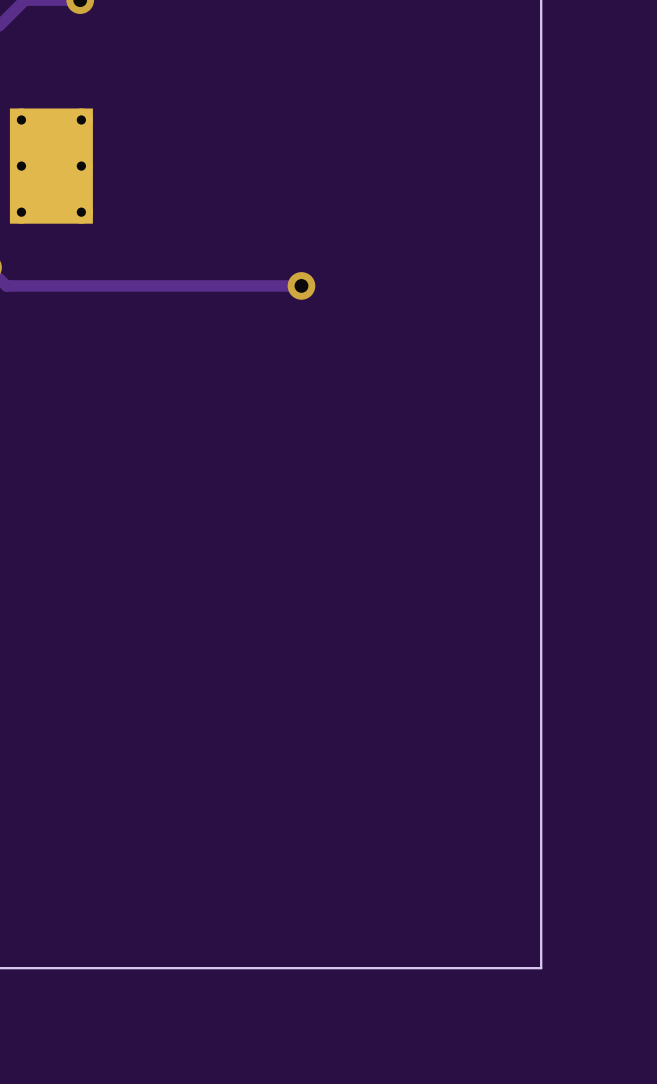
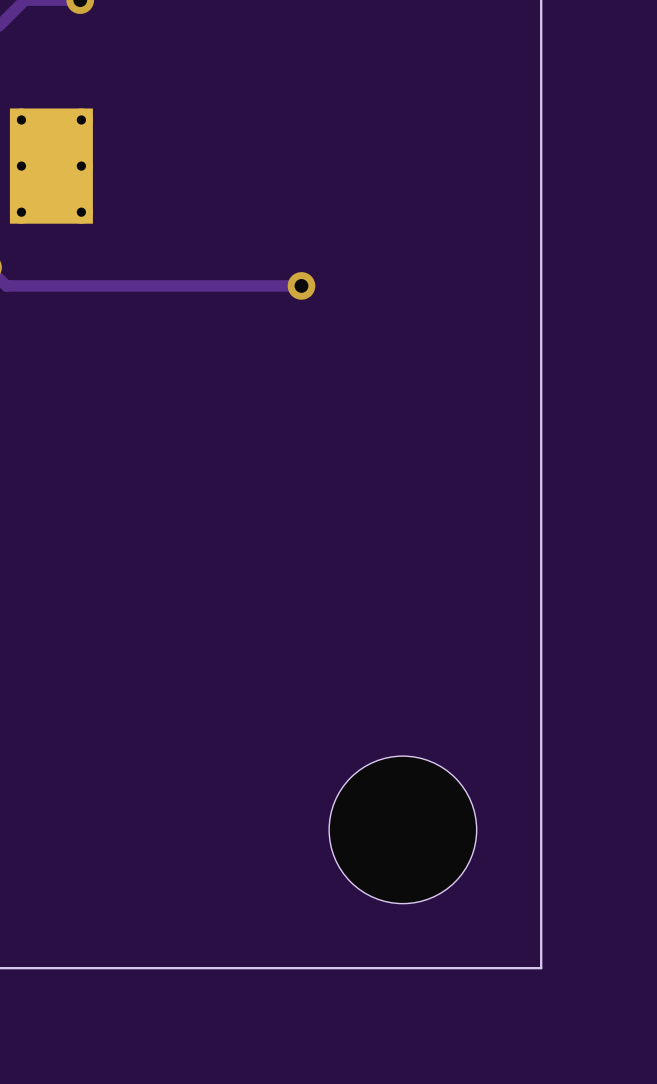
part: none -> (402, 829)

